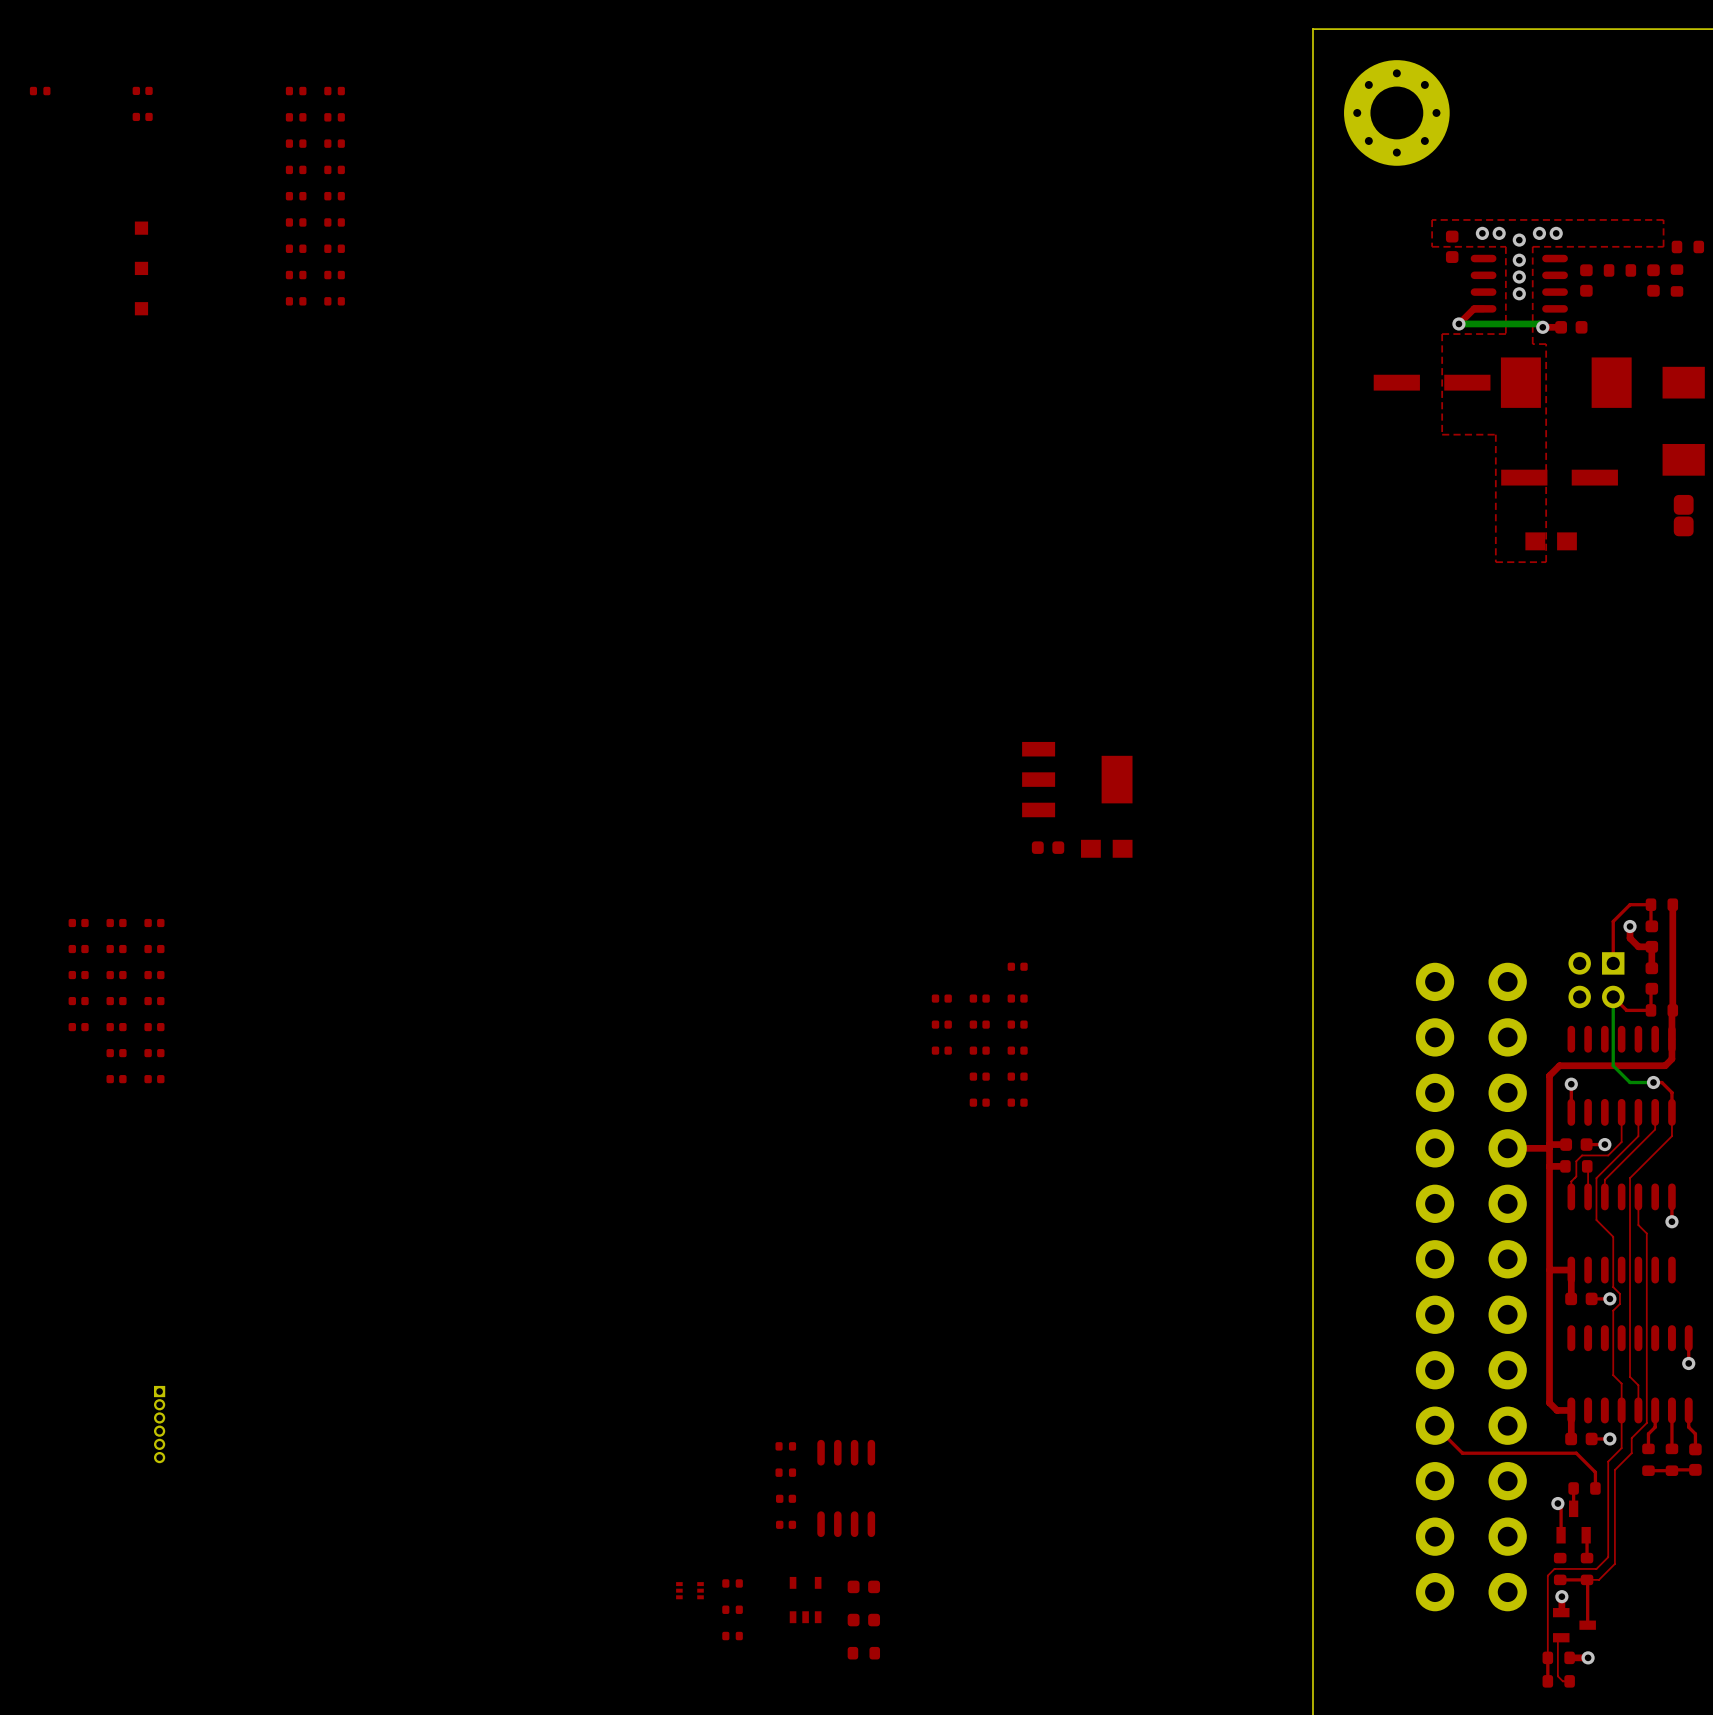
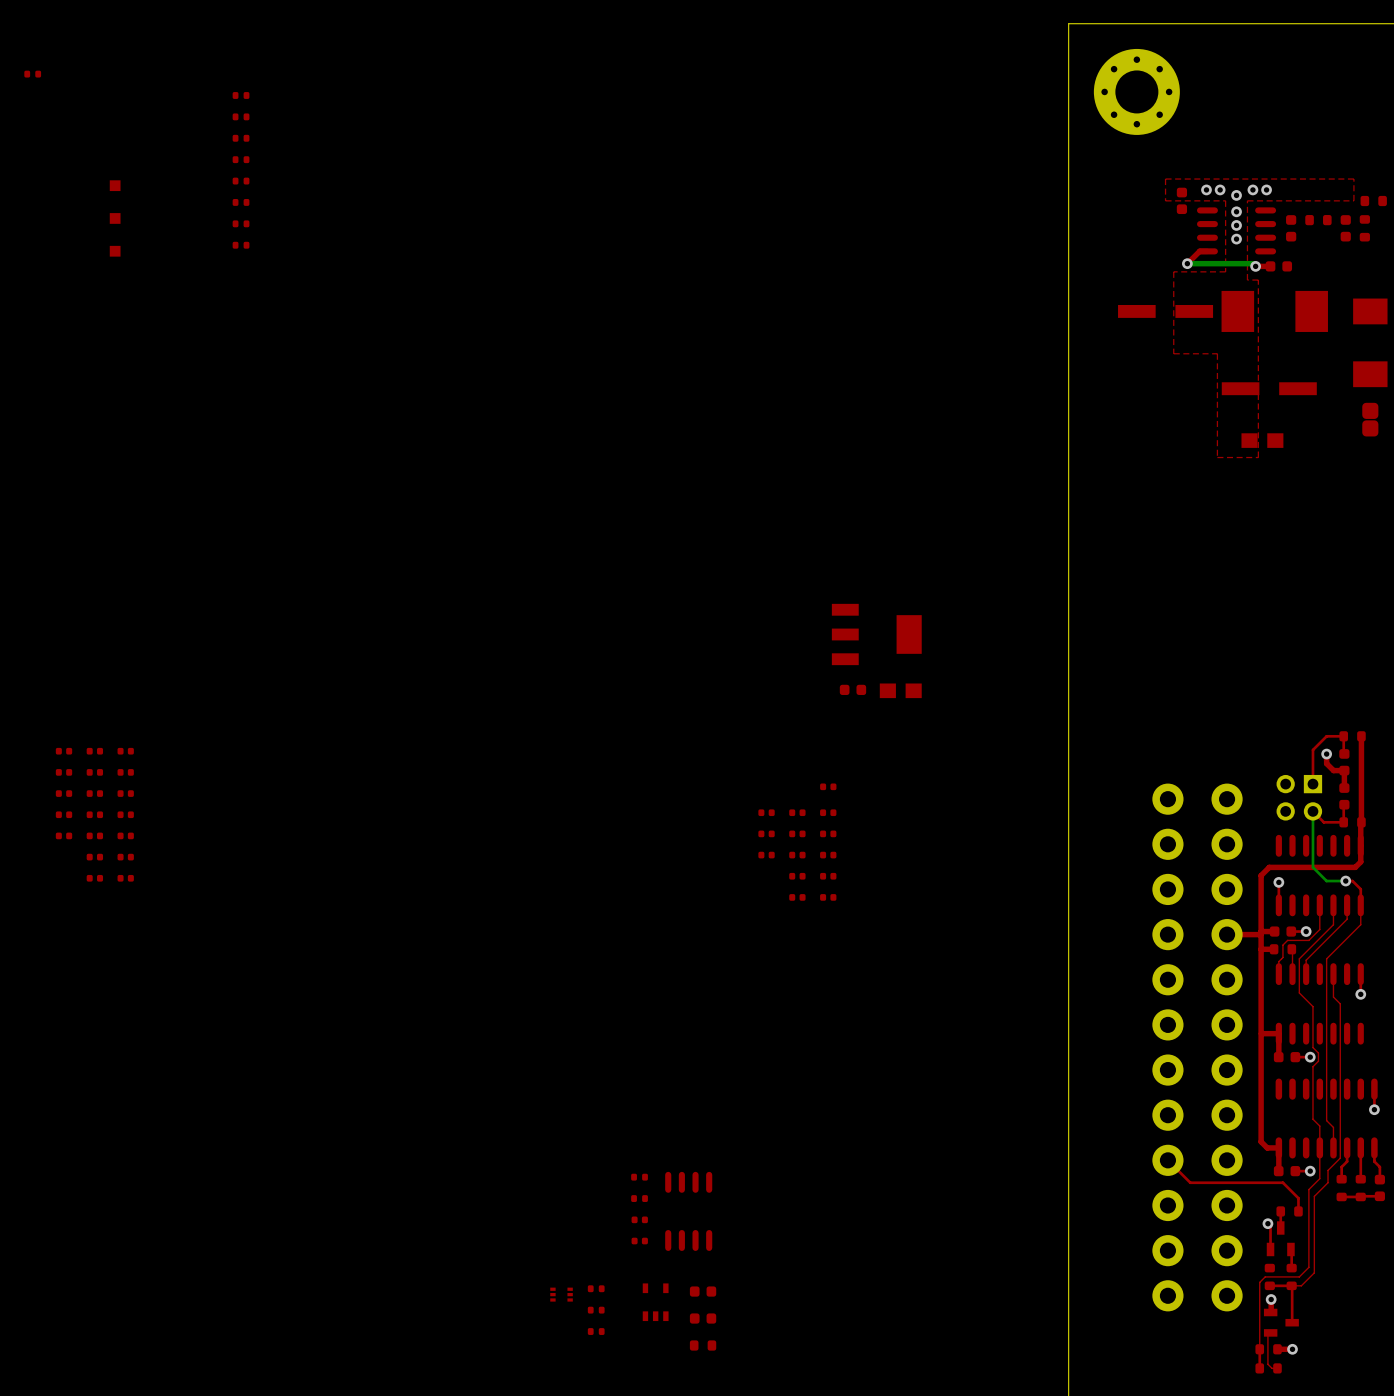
part: (142, 90) -> none
part: (296, 91) -> none
part: (334, 91) -> none
part: (142, 116) -> none
part: (334, 117) -> none
part: (334, 143) -> none
part: (334, 169) -> none
part: (334, 196) -> none
part: (334, 222) -> none
part: (334, 248) -> none
part: (334, 275) -> none
part: (334, 301) -> none
part: (159, 1424) -> none

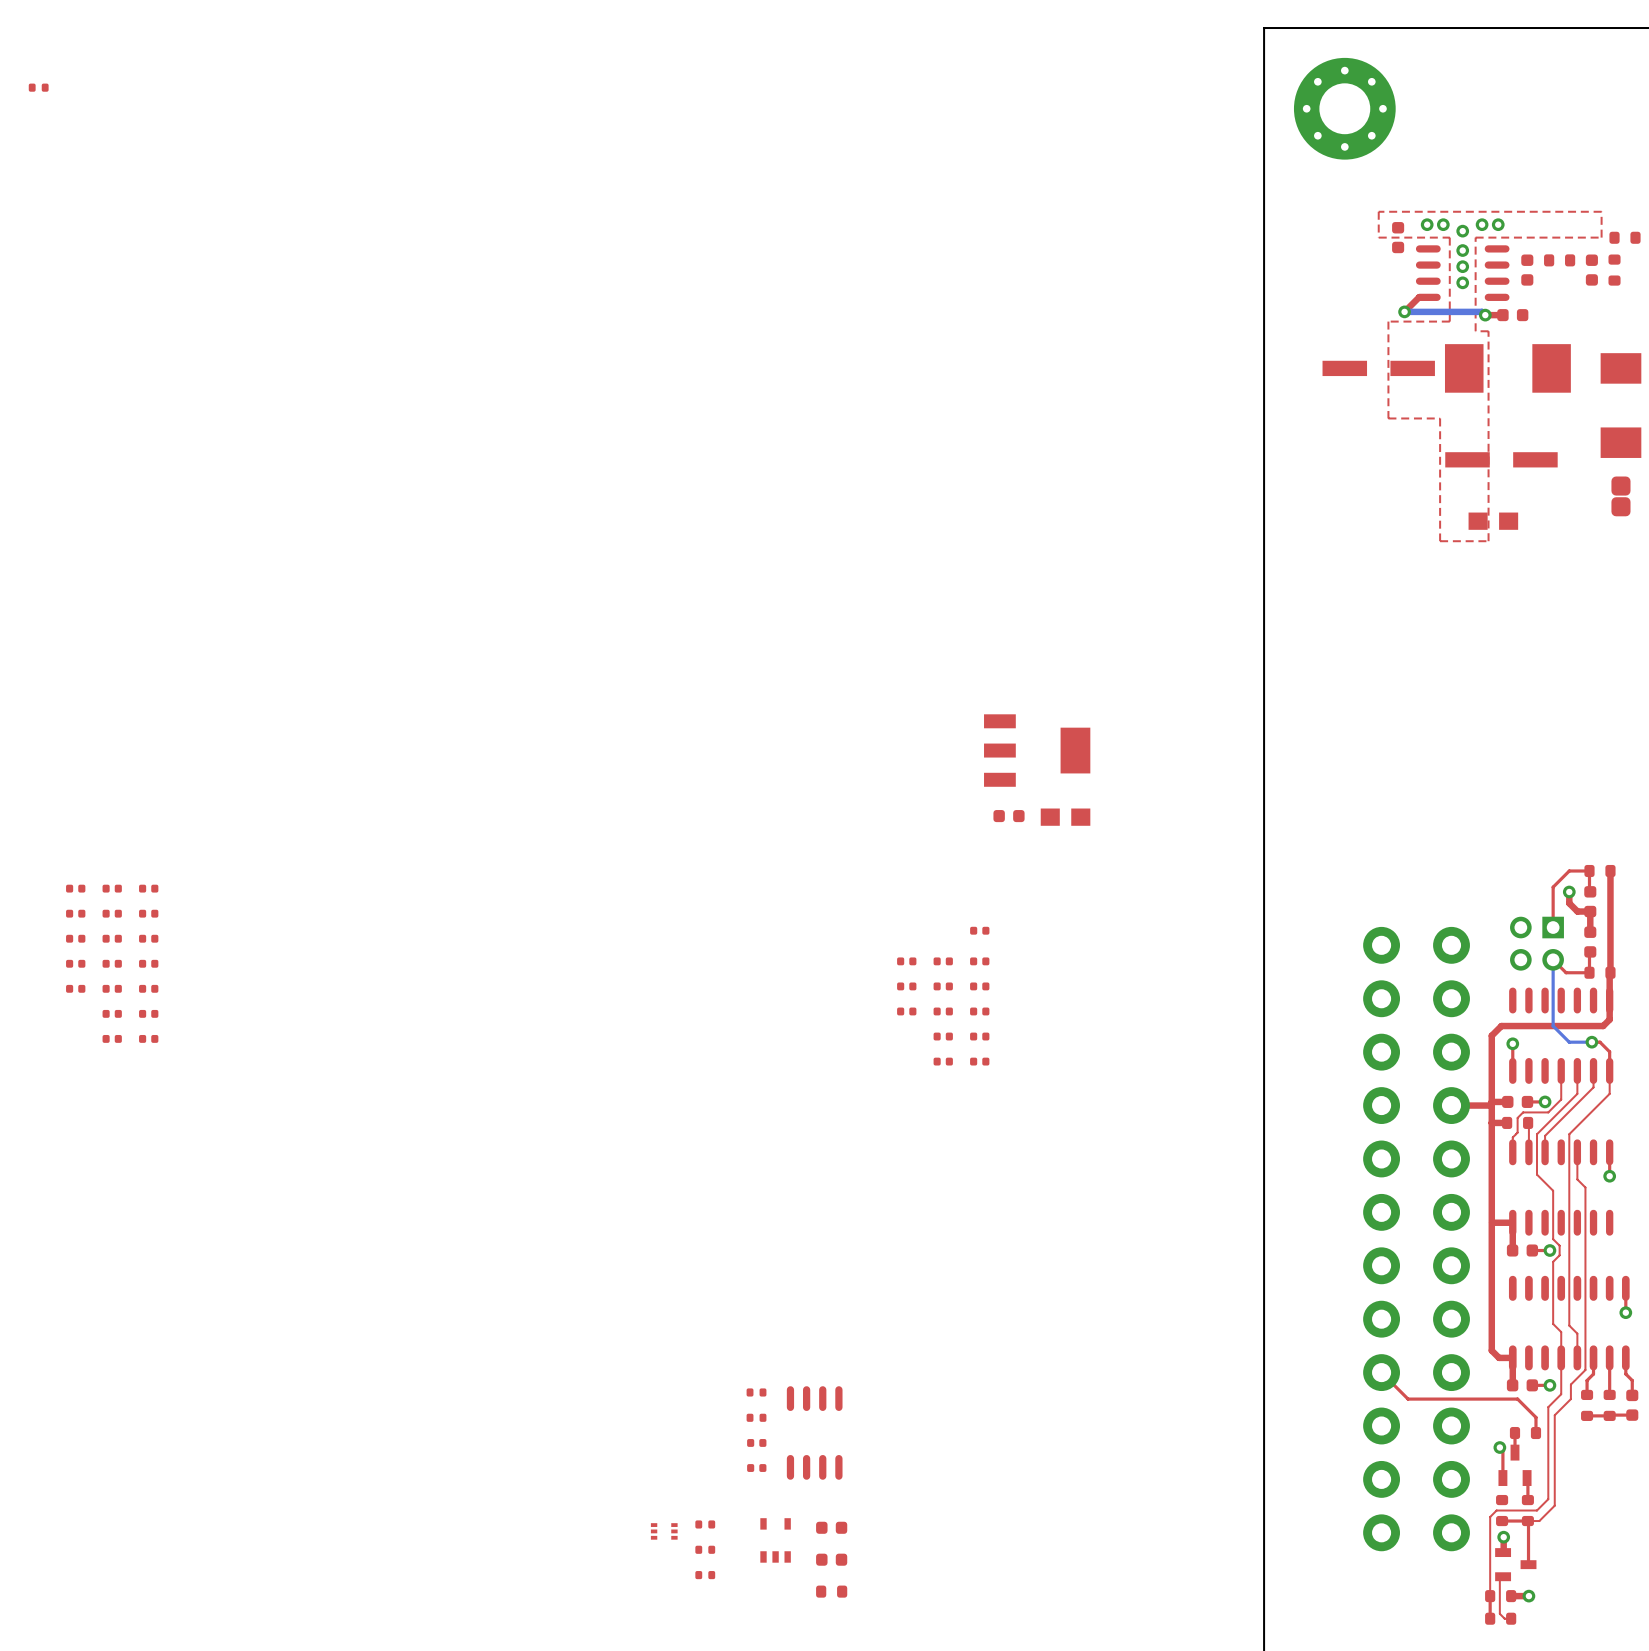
part: (241, 95) -> none
part: (241, 116) -> none
part: (241, 138) -> none
part: (241, 159) -> none
part: (241, 181) -> none
part: (115, 185) -> none
part: (241, 202) -> none
part: (115, 218) -> none
part: (241, 223) -> none
part: (241, 245) -> none
part: (115, 251) -> none

